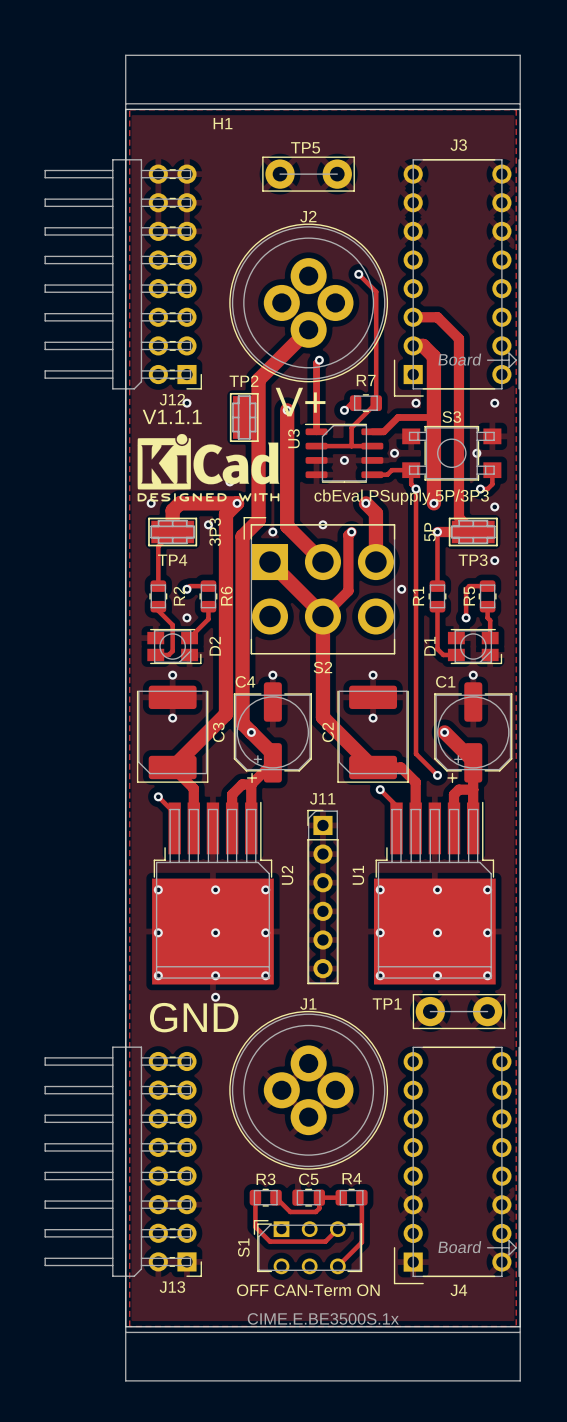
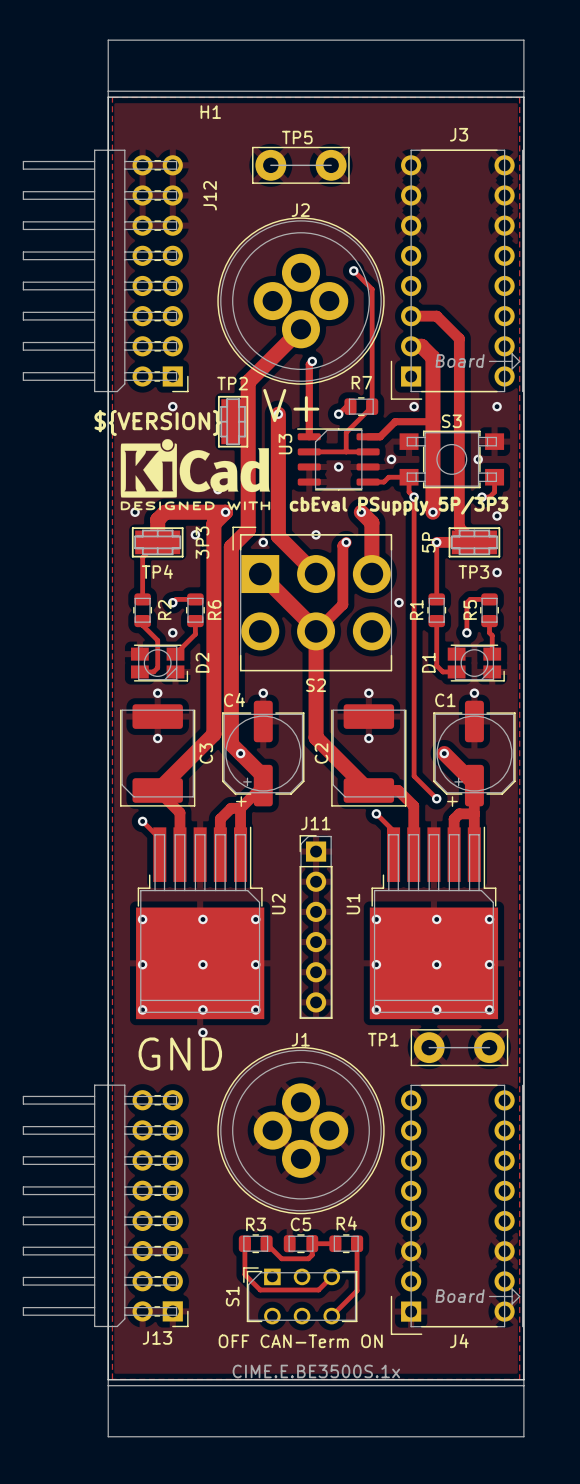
J12 name rotation: 0° (172, 399) -> 90° counterclockwise (210, 195)
J12 name position: J12 (172, 399) -> J12 (210, 195)
text: V1.1.1 (172, 416) -> ${VERSION} (157, 422)

